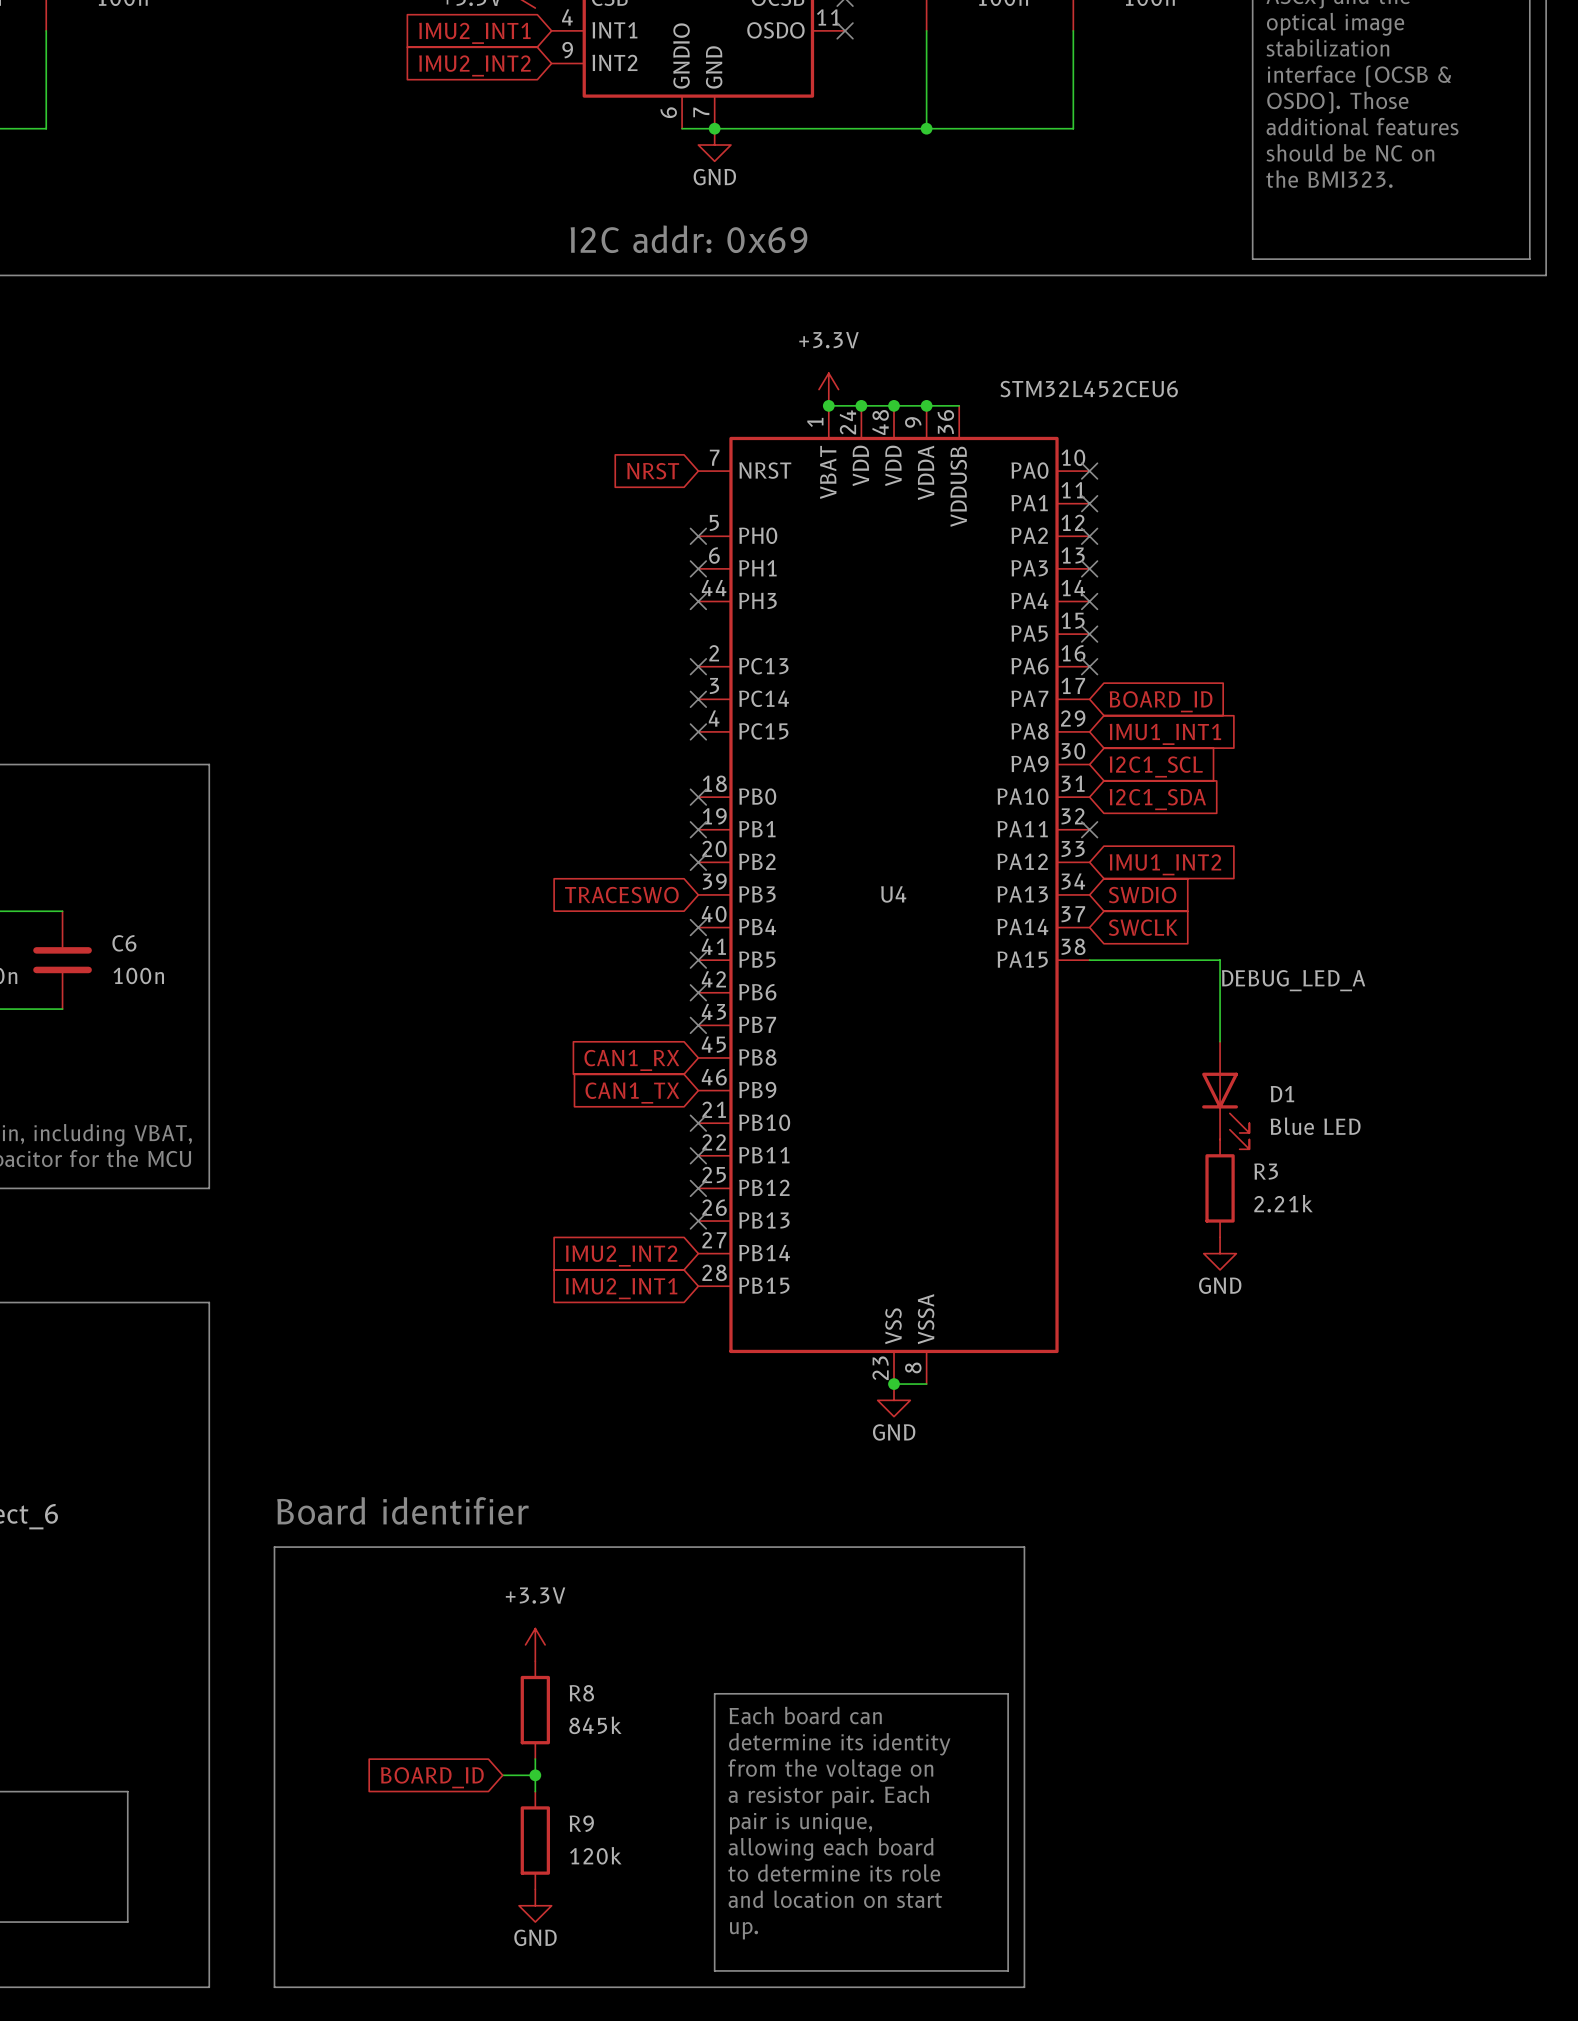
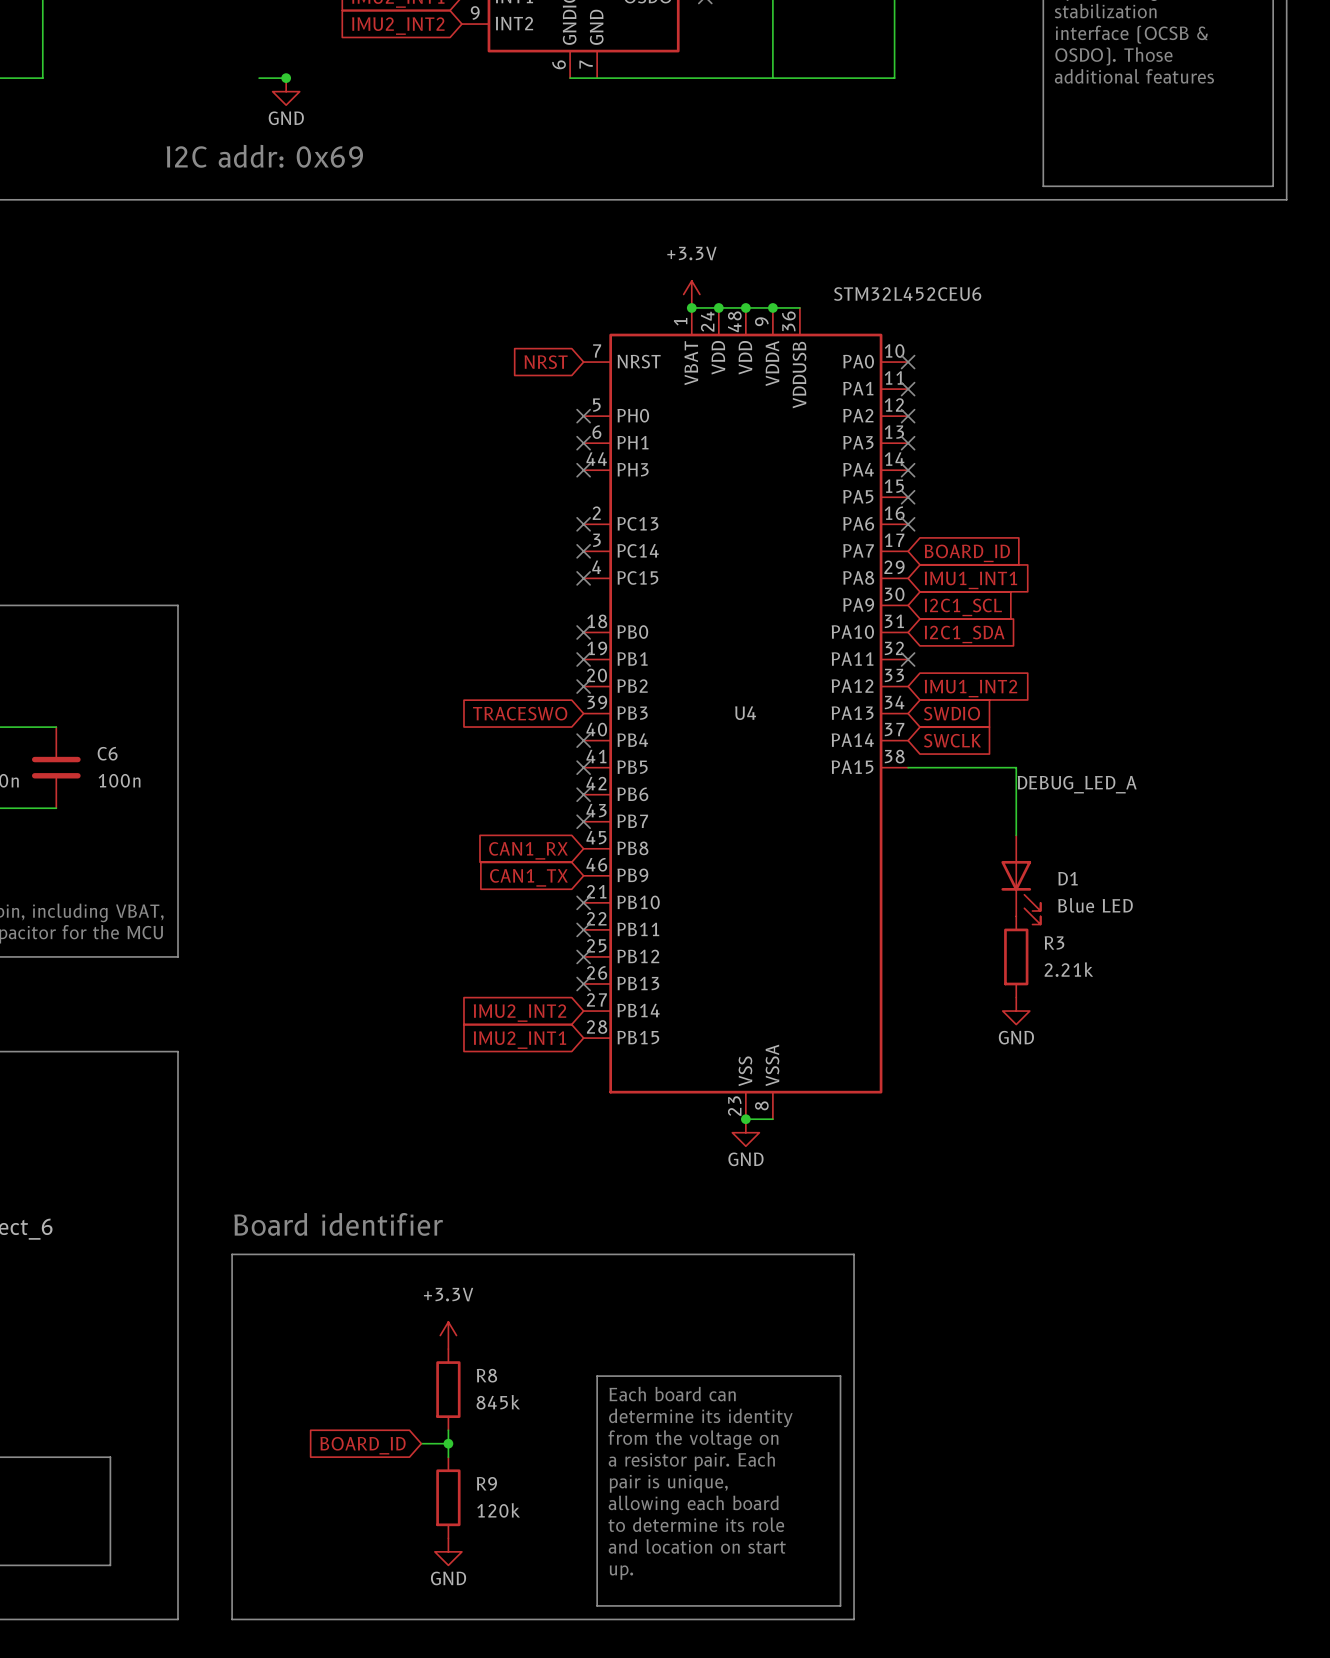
wire: none -> (259, 78) (286, 78)
junction: none -> (286, 78)
junction: (714, 128) -> none
junction: (926, 128) -> none
power symbol: none -> GND (286, 91)
power symbol: GND (714, 145) -> none
text: should be NC on (1350, 152) -> none
text: the BMI323. (1329, 179) -> none
text: none -> I2C addr: 0x69 (264, 156)
text: I2C addr: 0x69 (688, 239) -> none

